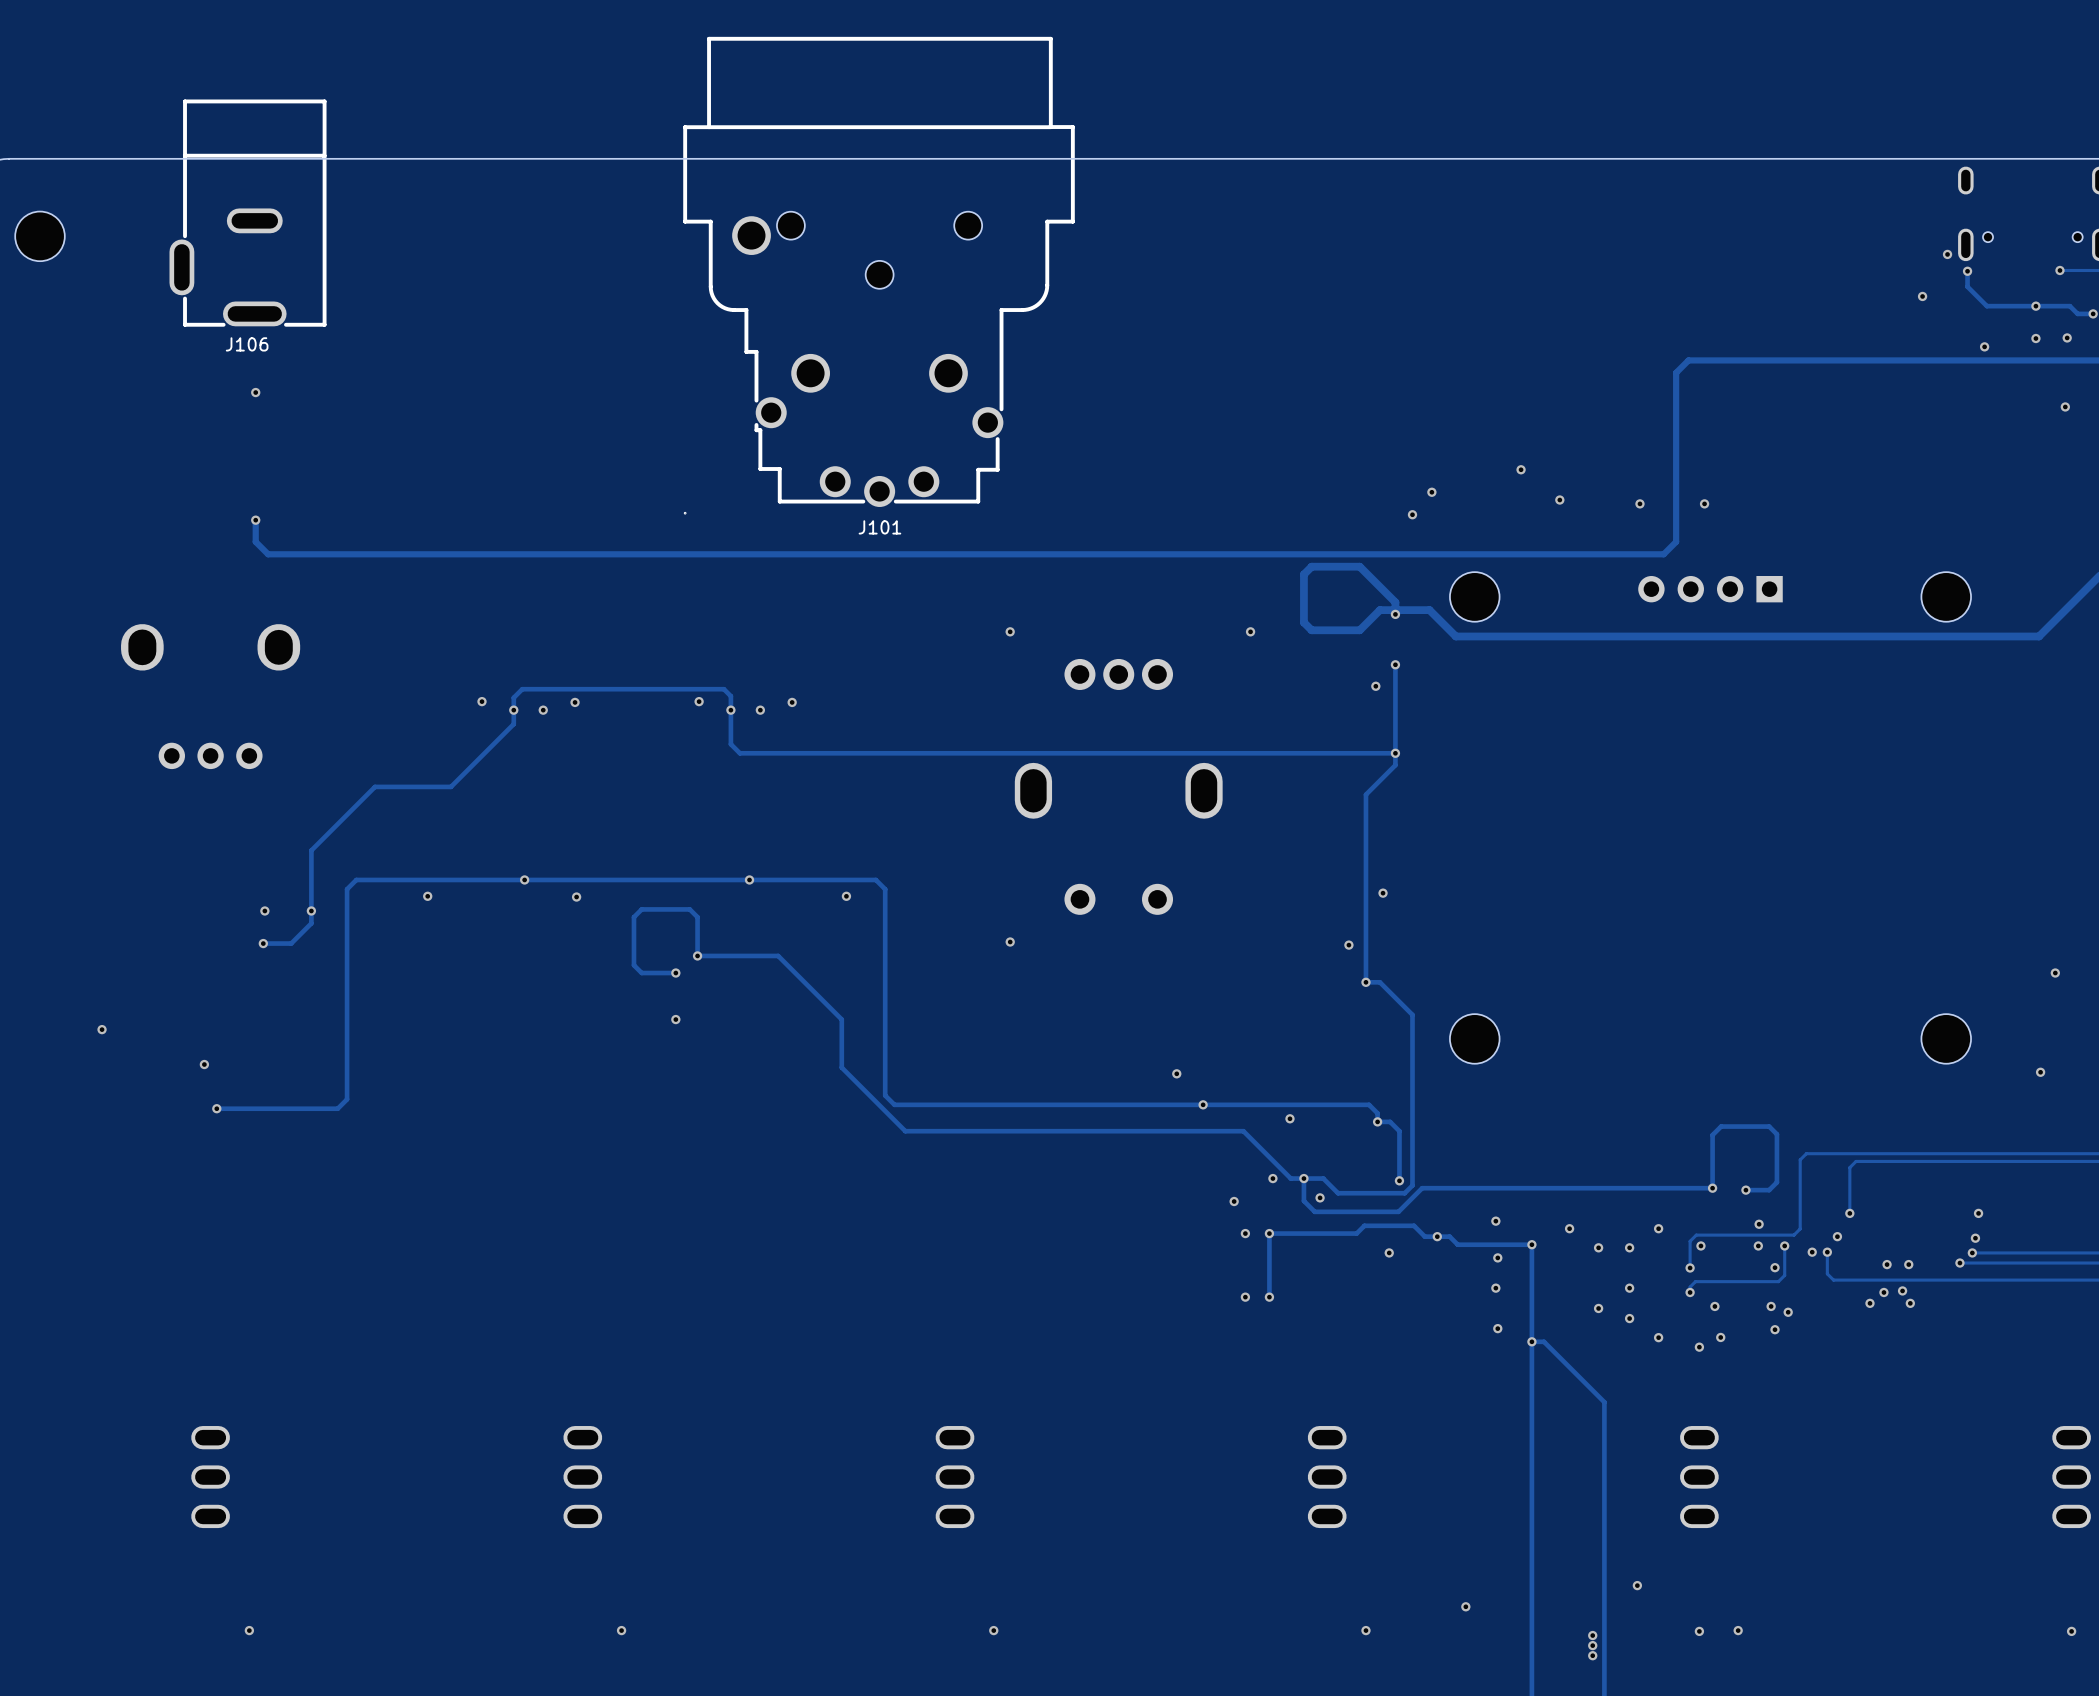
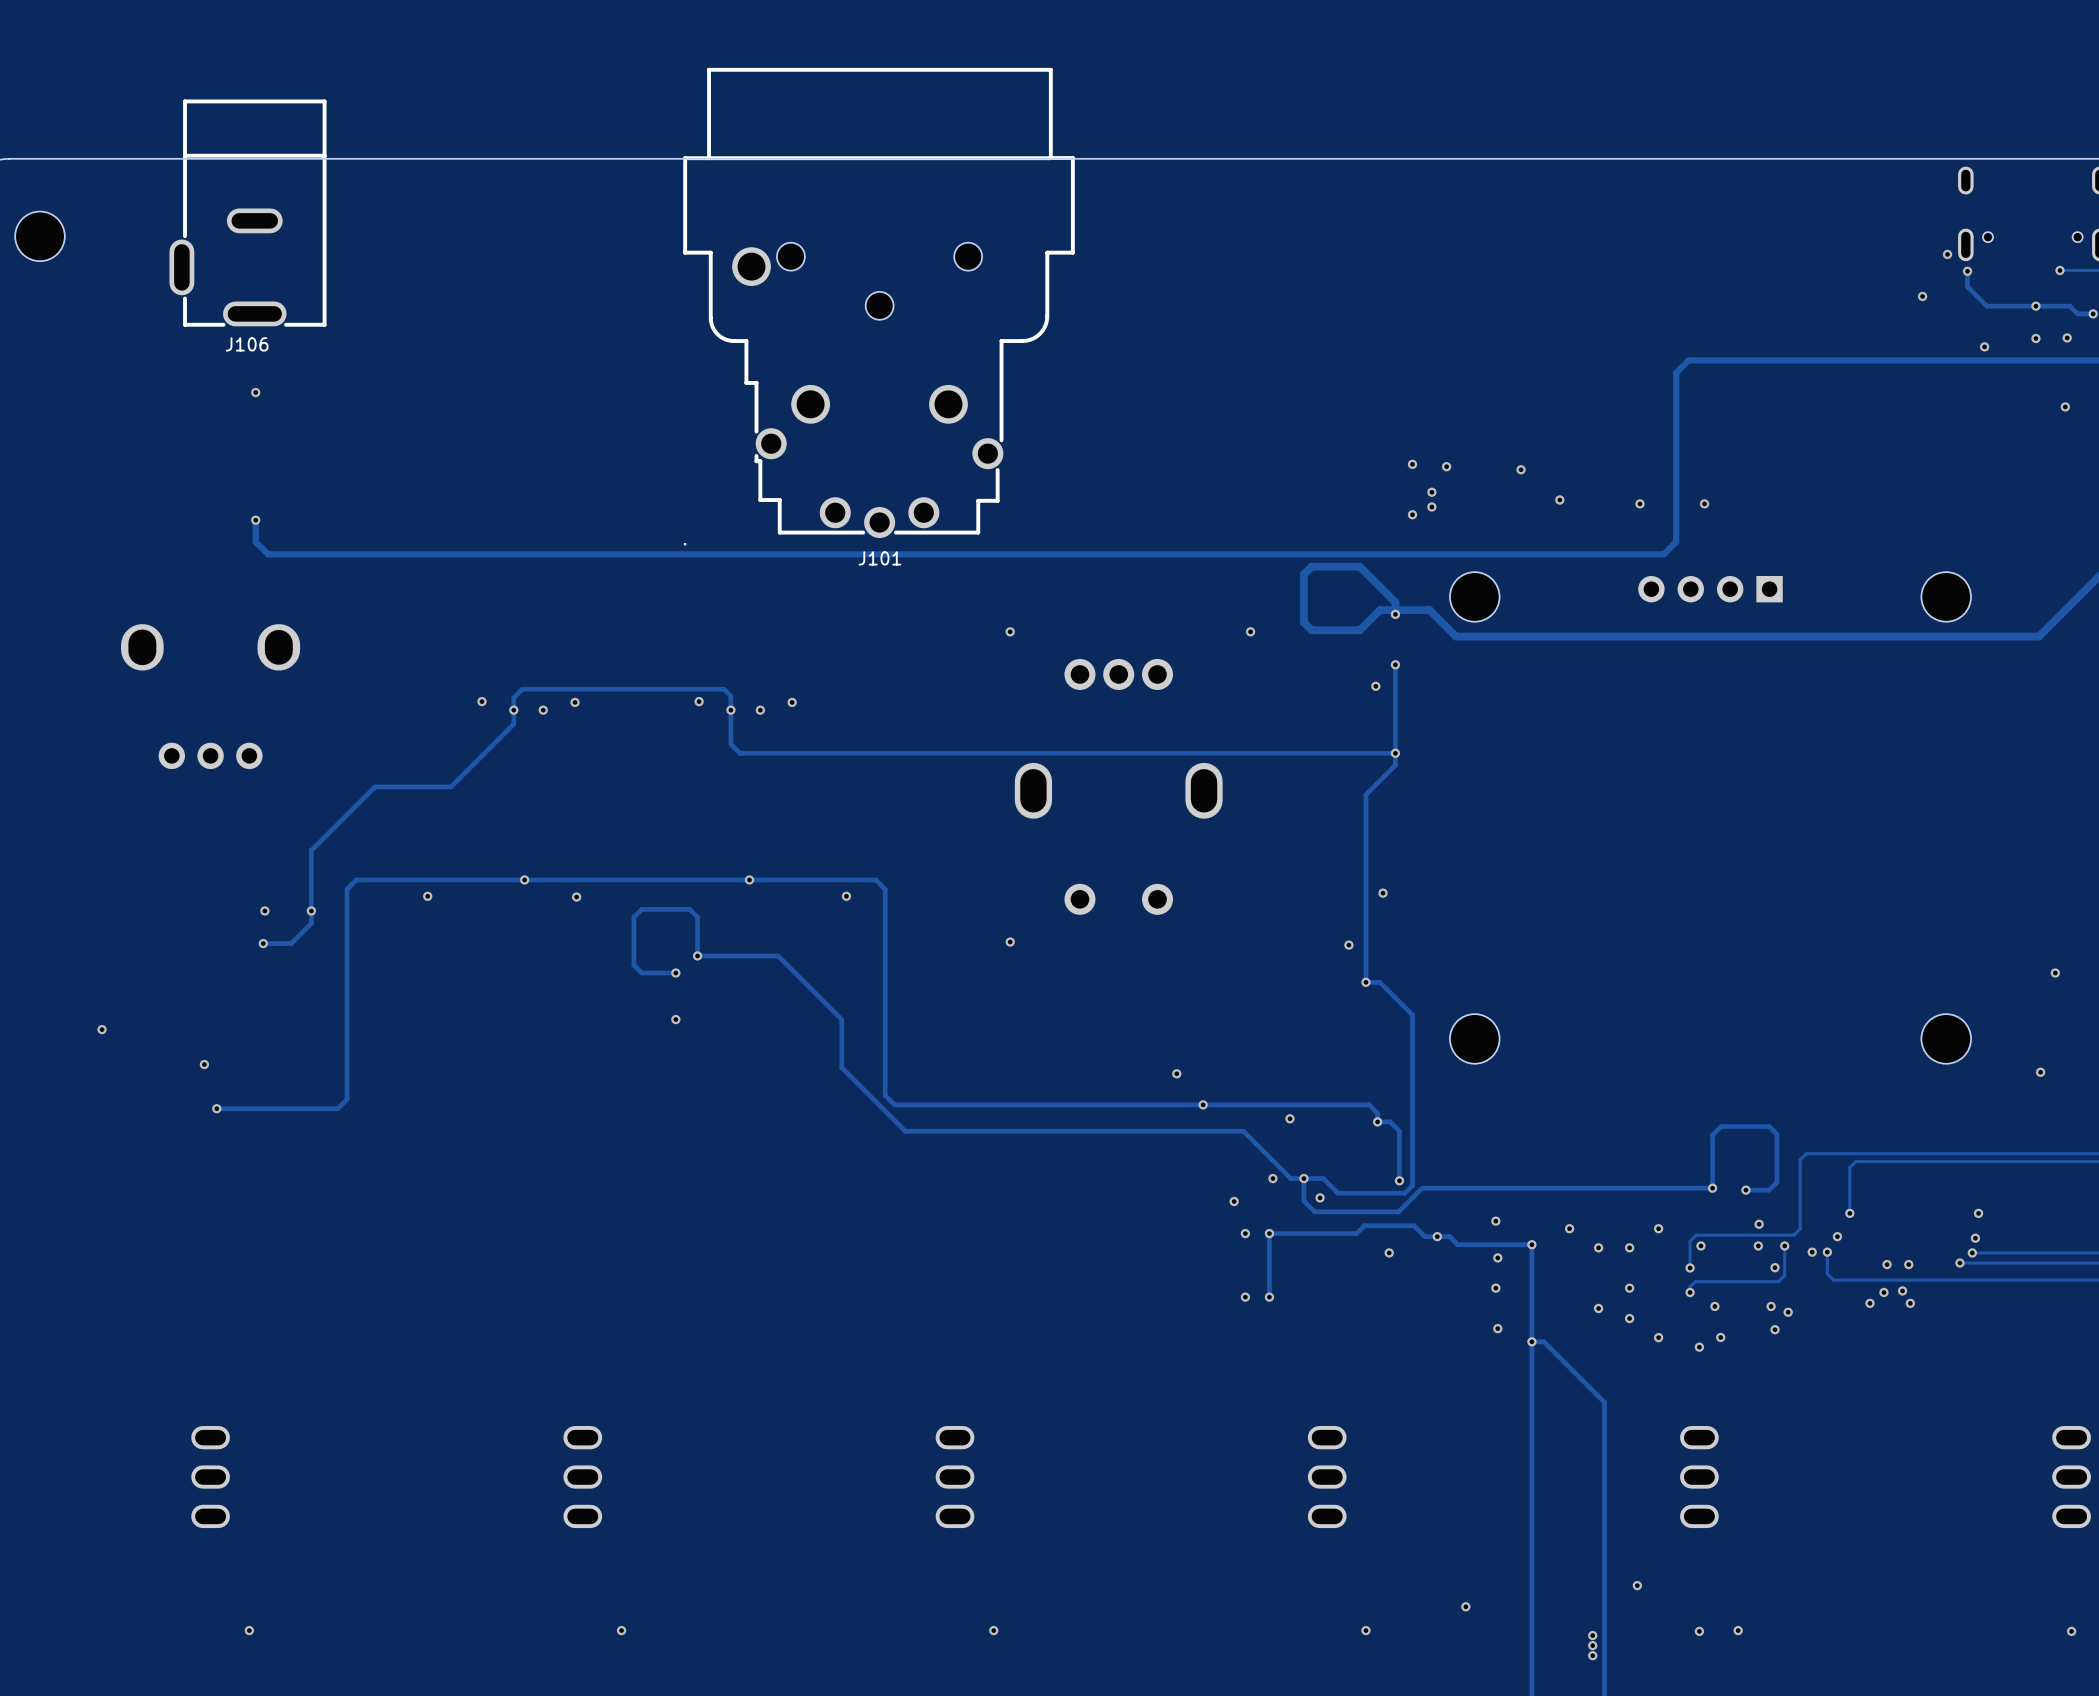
J101 position: (879, 275) -> (879, 306)
via: none -> (1412, 464)
via: none -> (1446, 466)
via: none -> (1431, 506)

